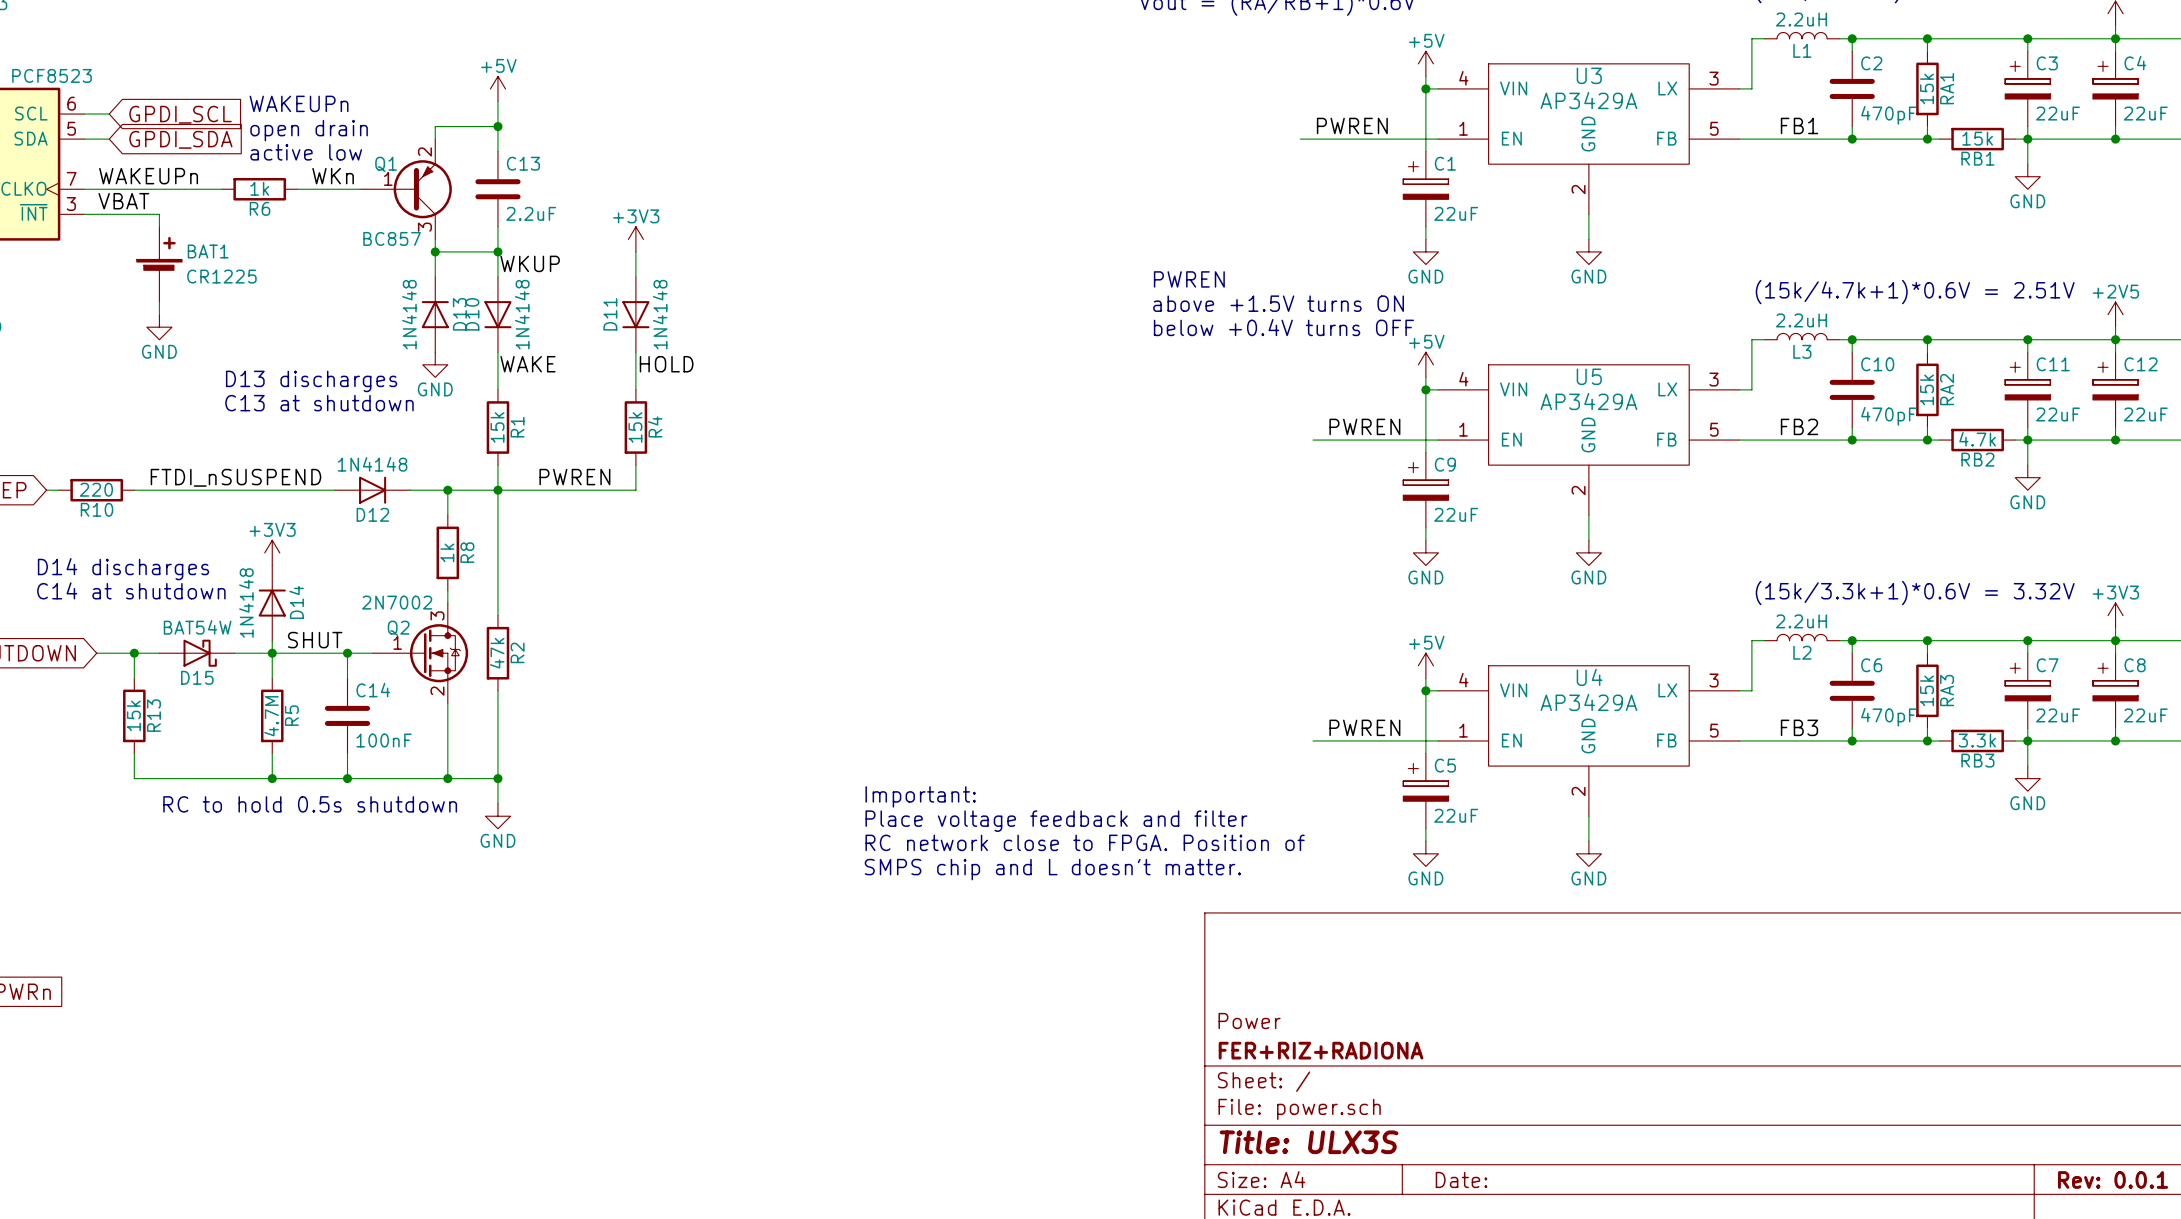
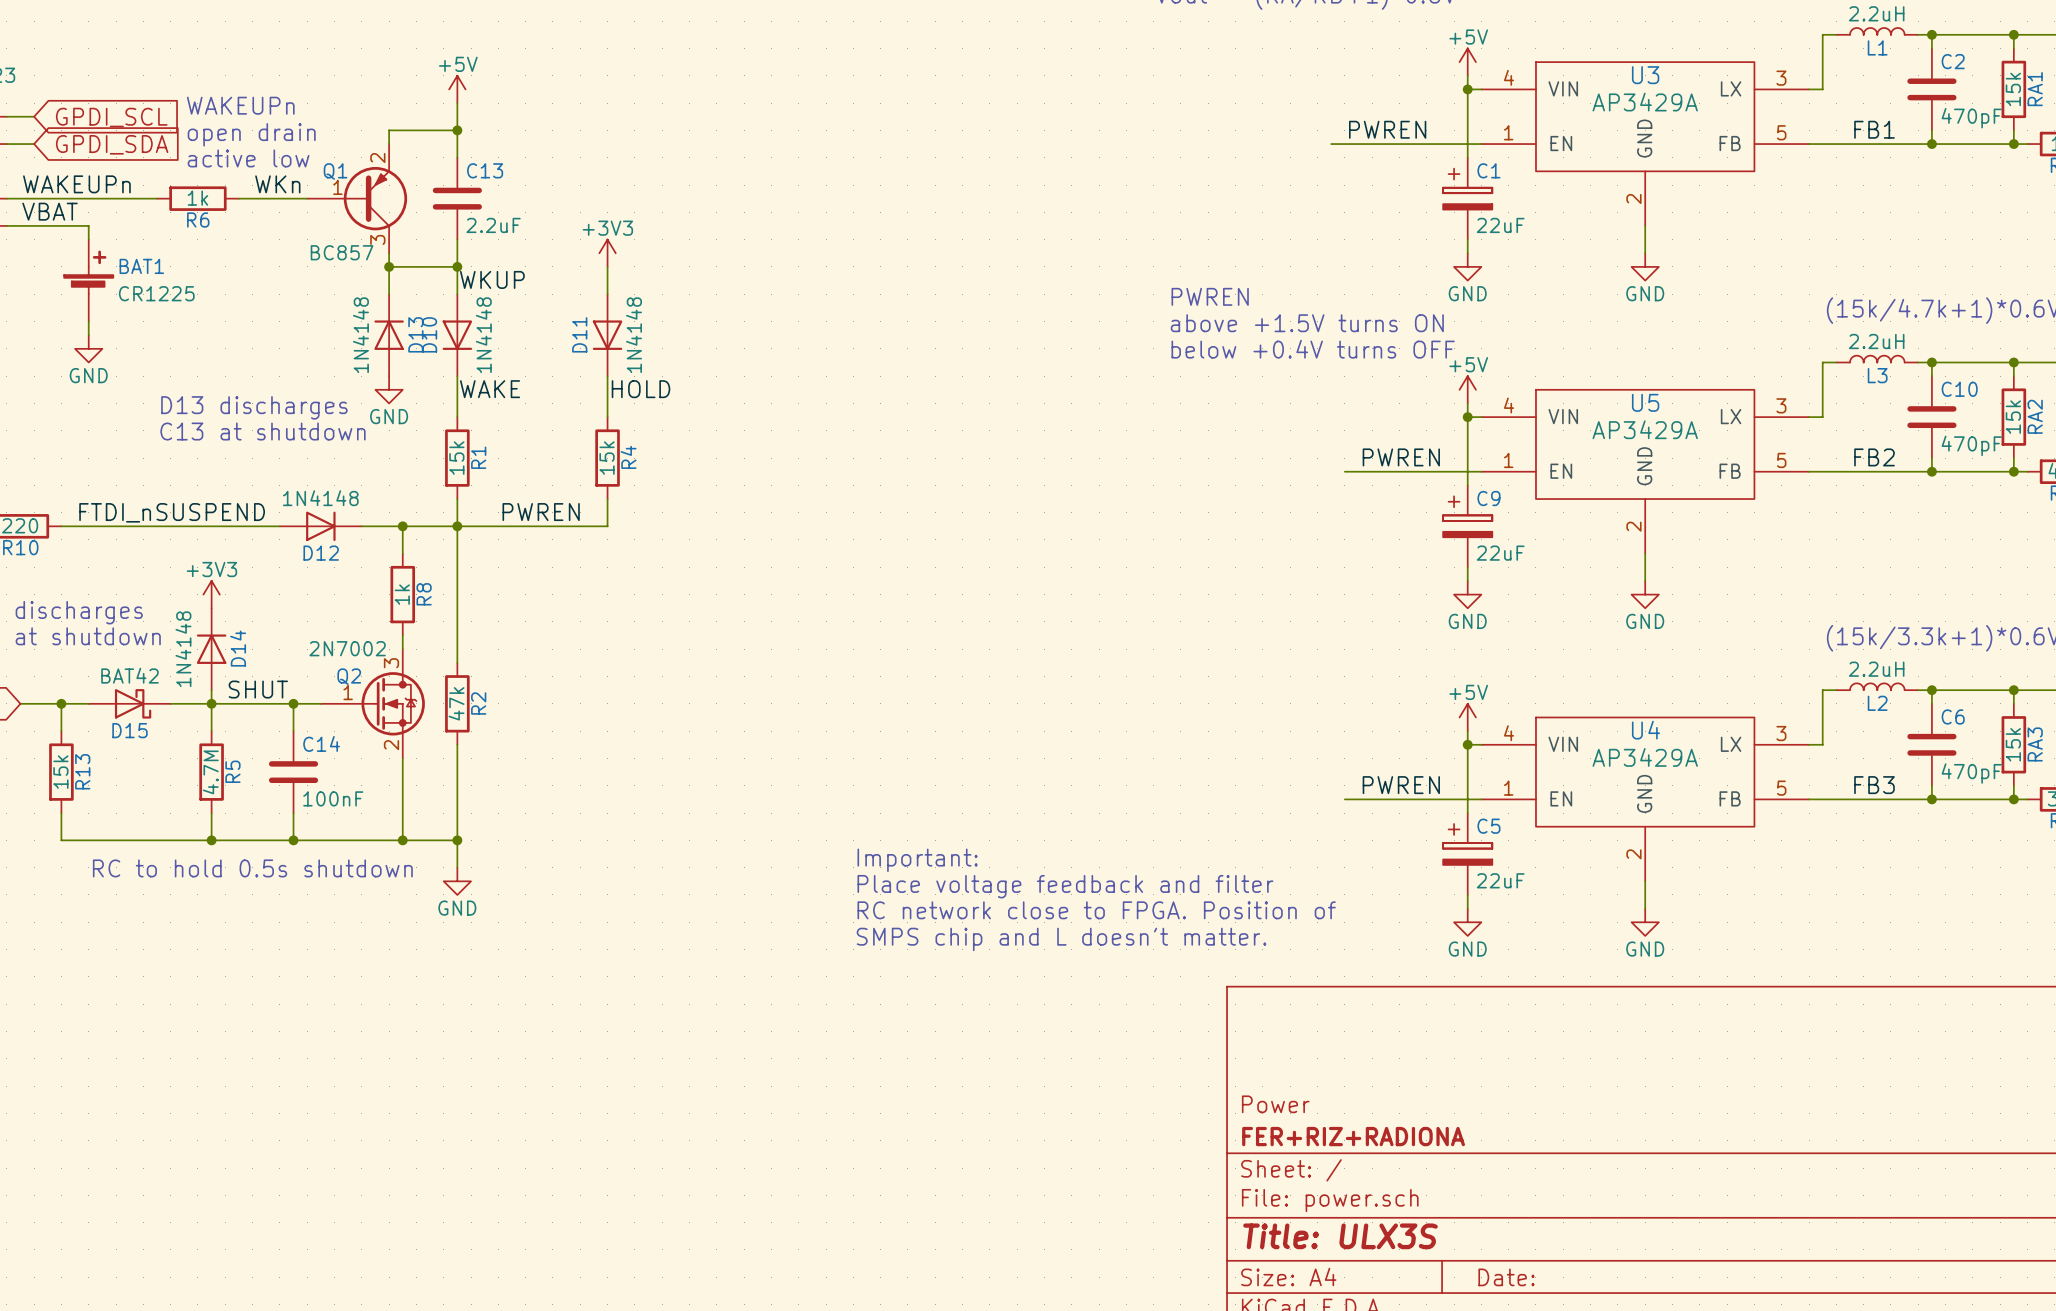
D15 value: BAT54W (197, 627) -> BAT42 (130, 675)

